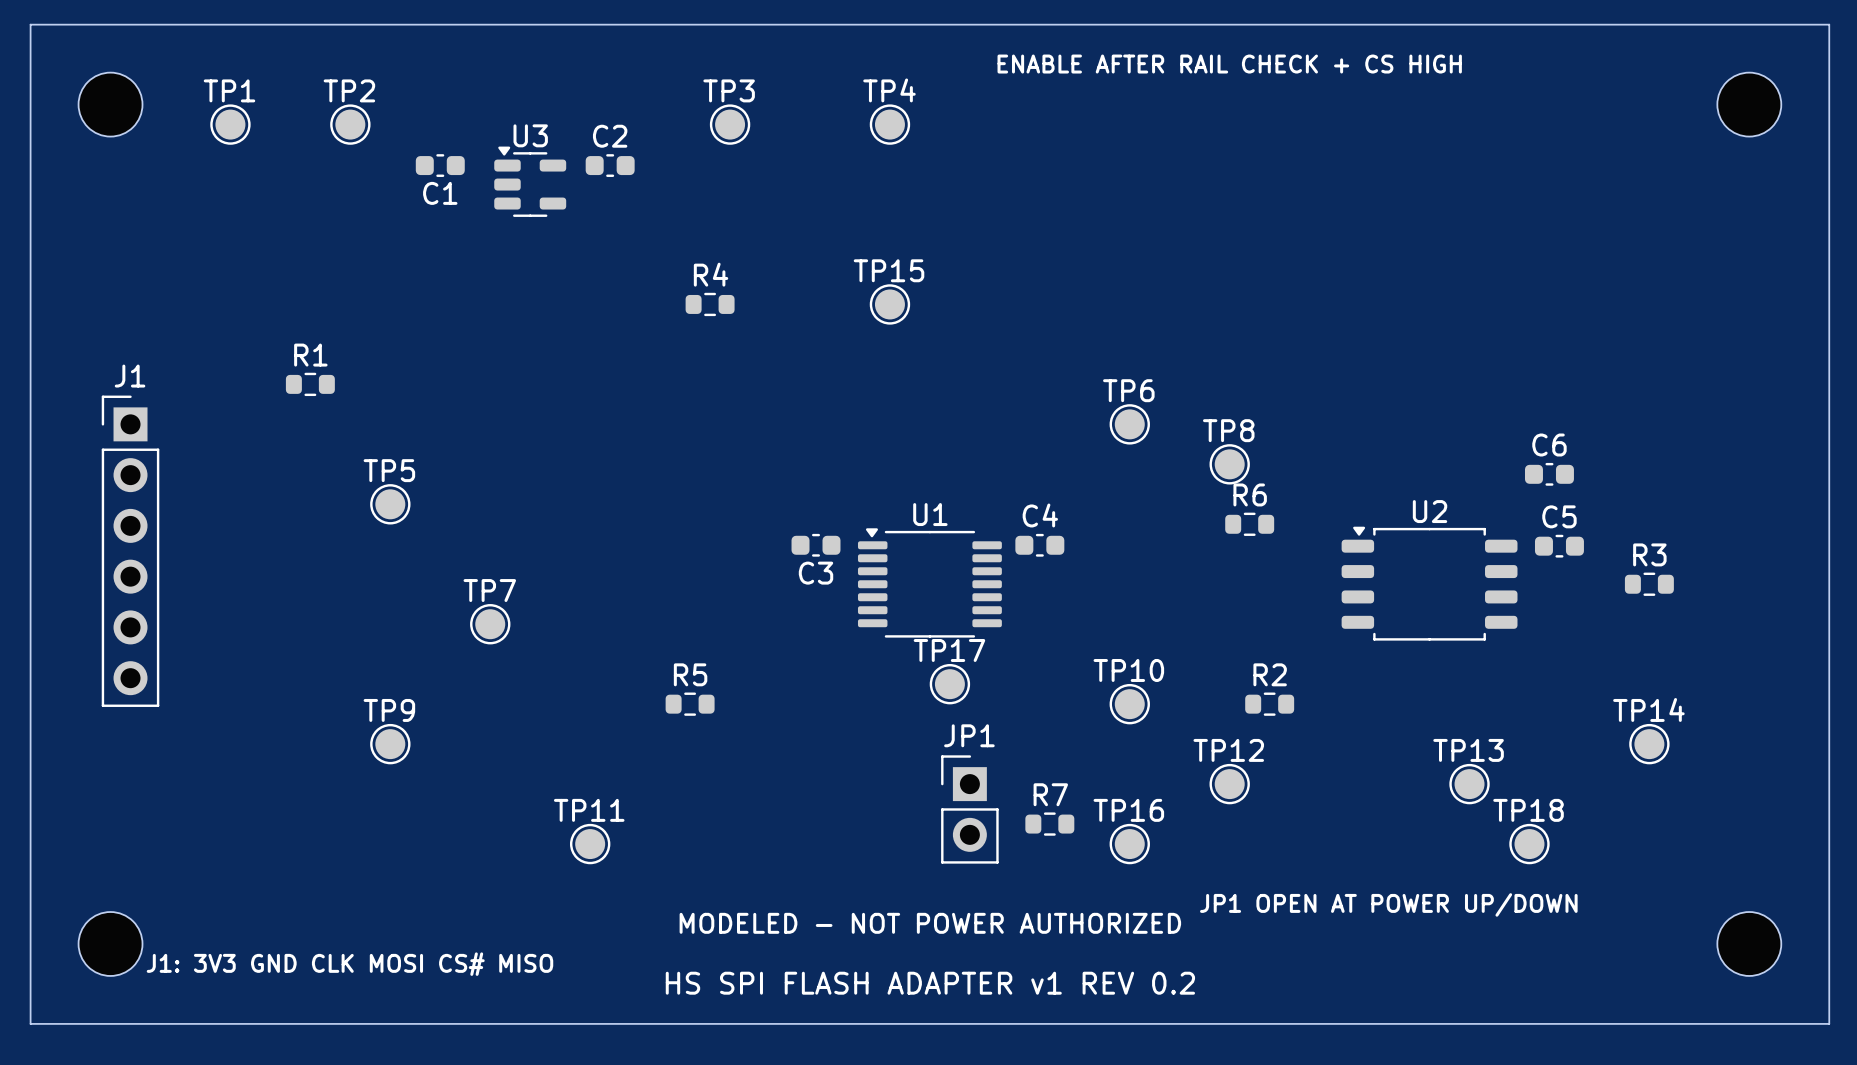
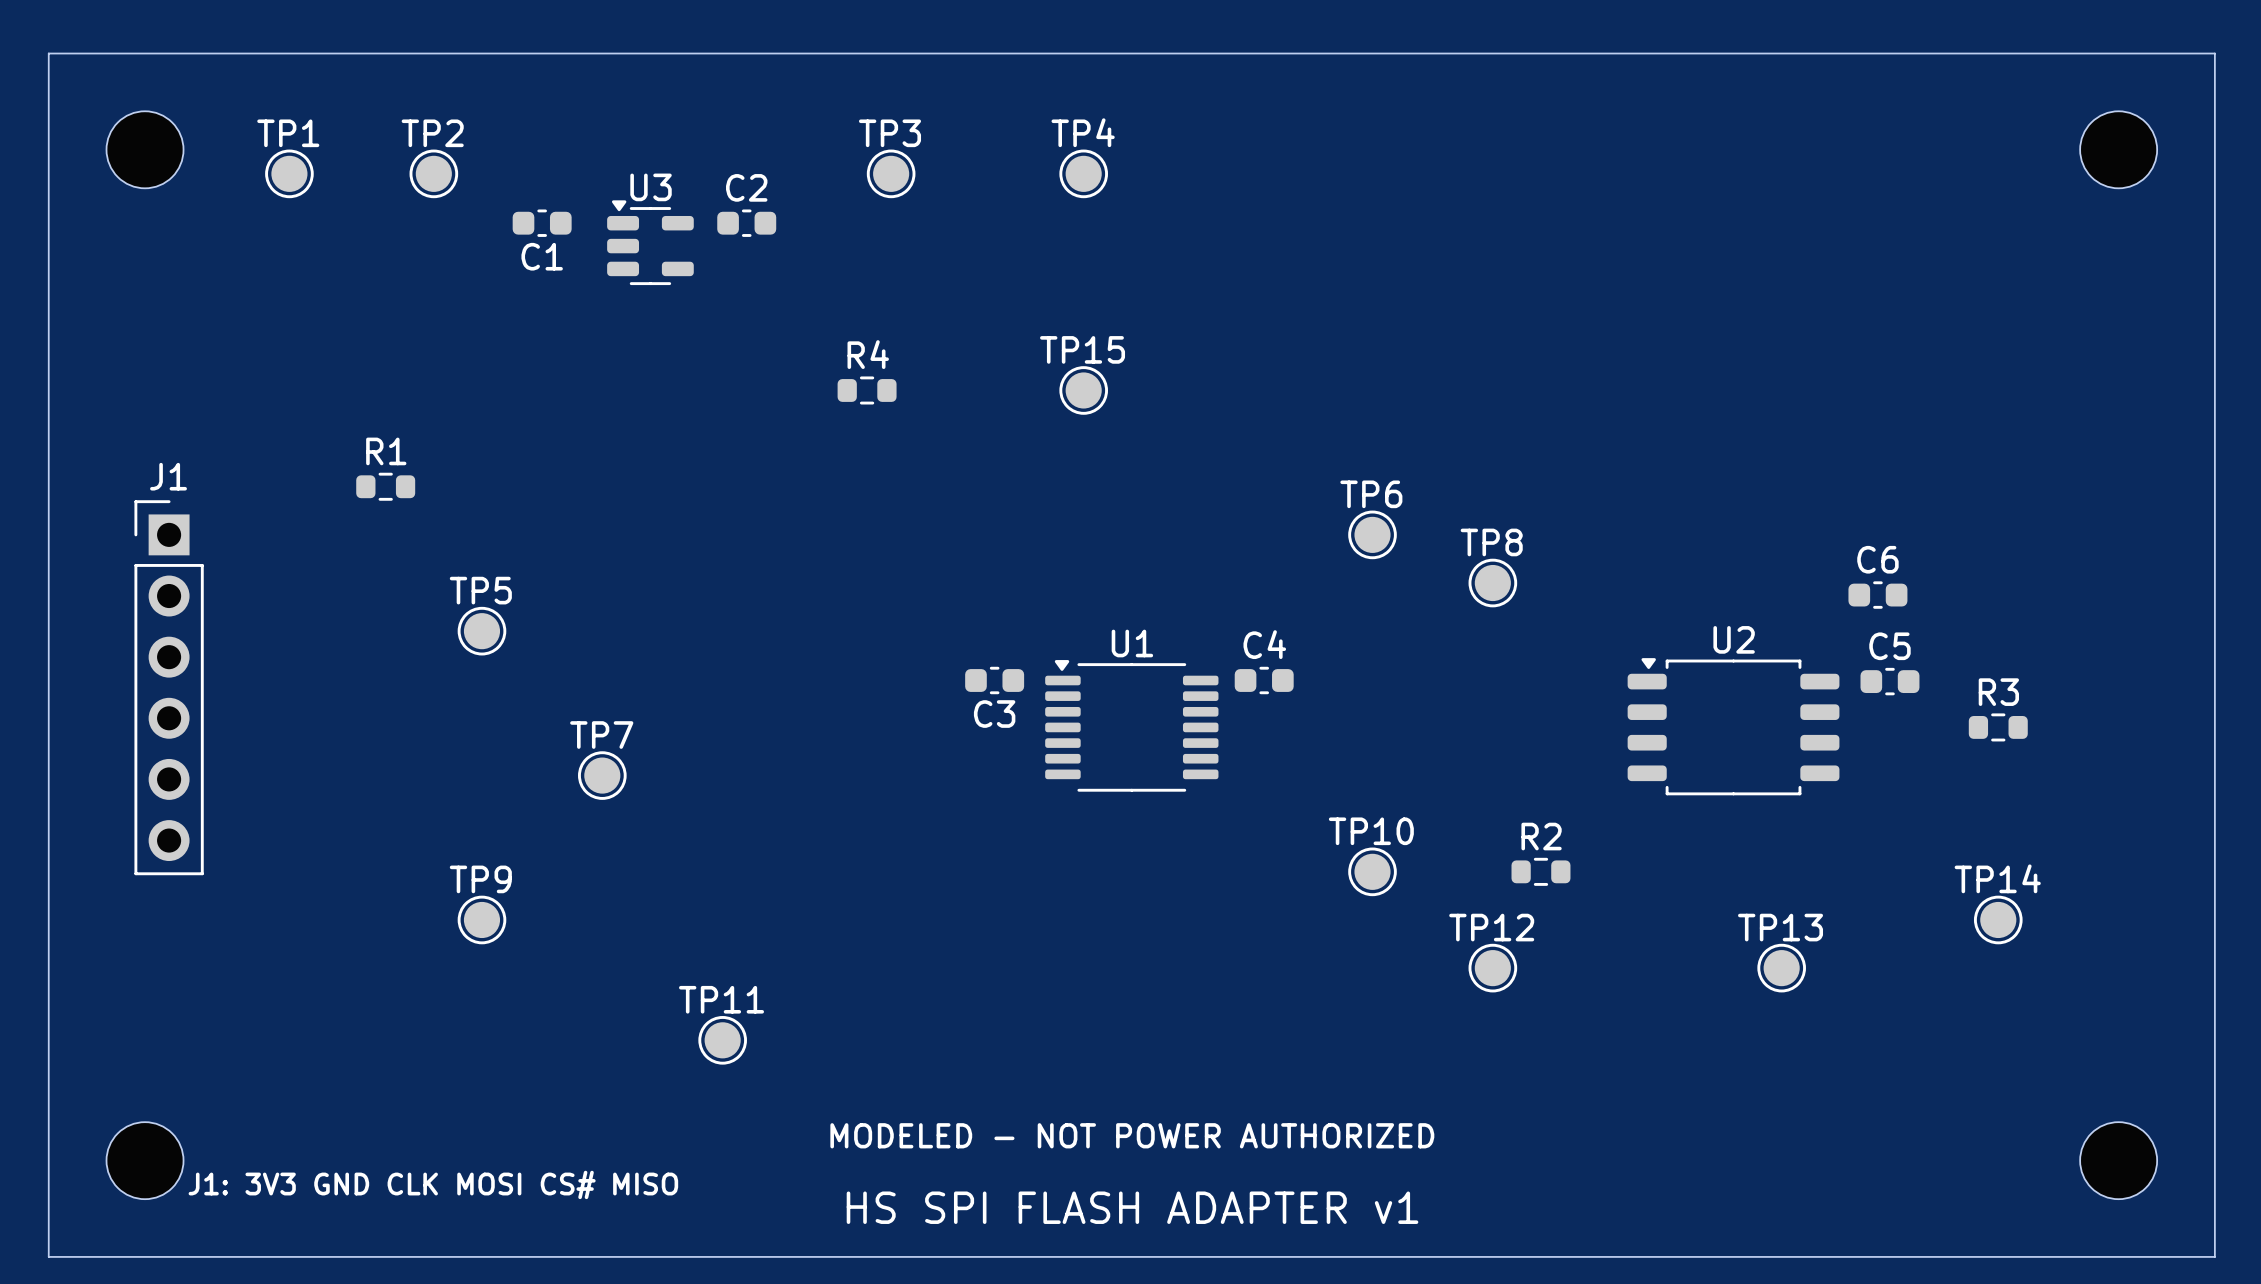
text: ENABLE AFTER RAIL CHECK + CS HIGH (1229, 64) -> none
R6: (1249, 524) -> none
TP17: (949, 684) -> none
R5: (690, 704) -> none
JP1: (969, 809) -> none
R7: (1049, 824) -> none
TP16: (1129, 844) -> none
TP18: (1529, 844) -> none
text: JP1 OPEN AT POWER UP/DOWN (1388, 904) -> none
text: HS SPI FLASH ADAPTER v1 REV 0.2 (930, 983) -> HS SPI FLASH ADAPTER v1 (1132, 1207)

